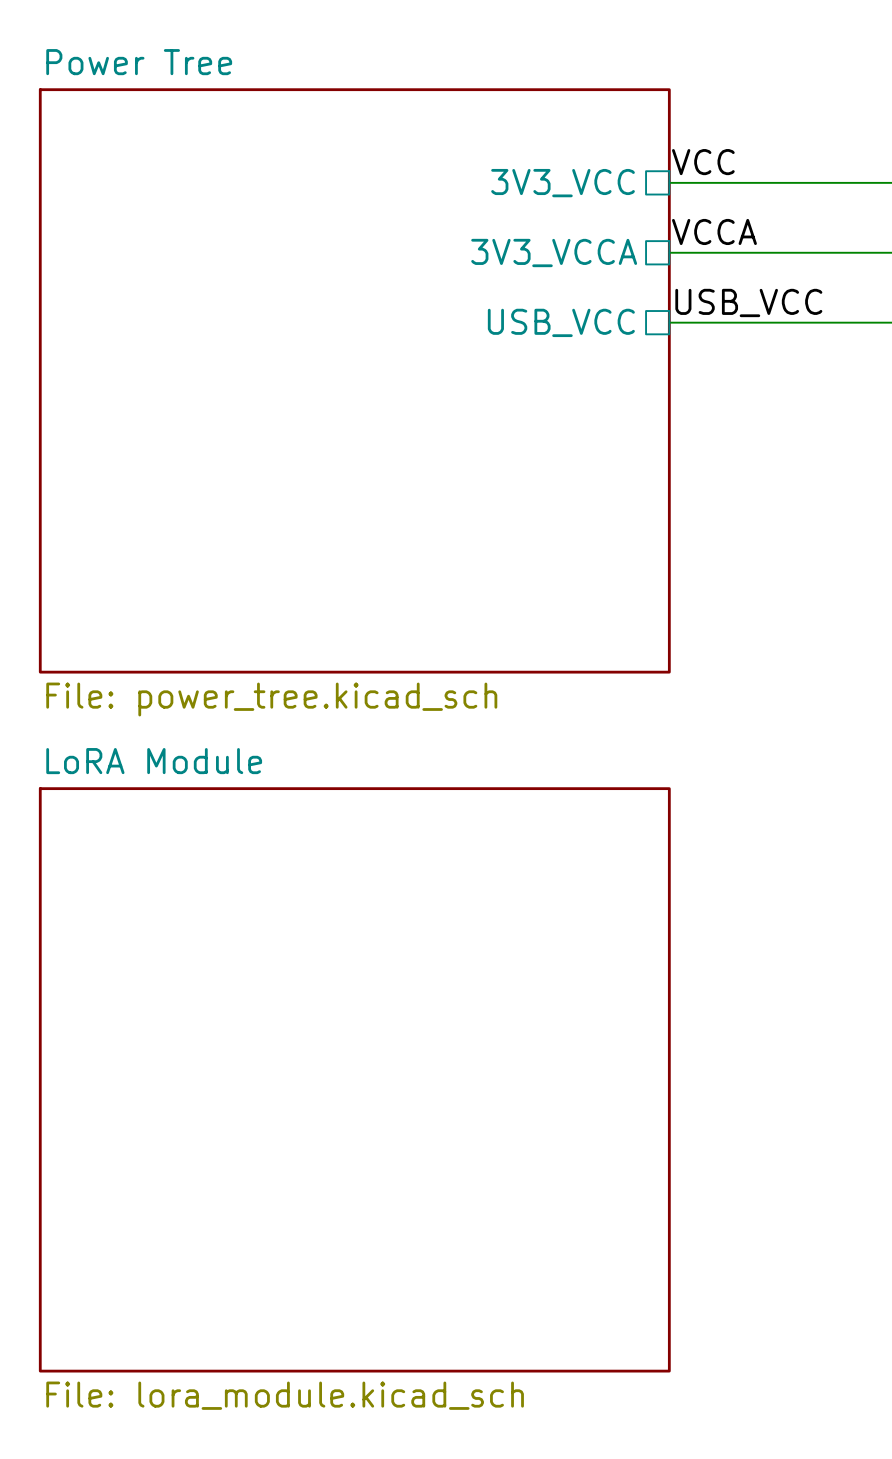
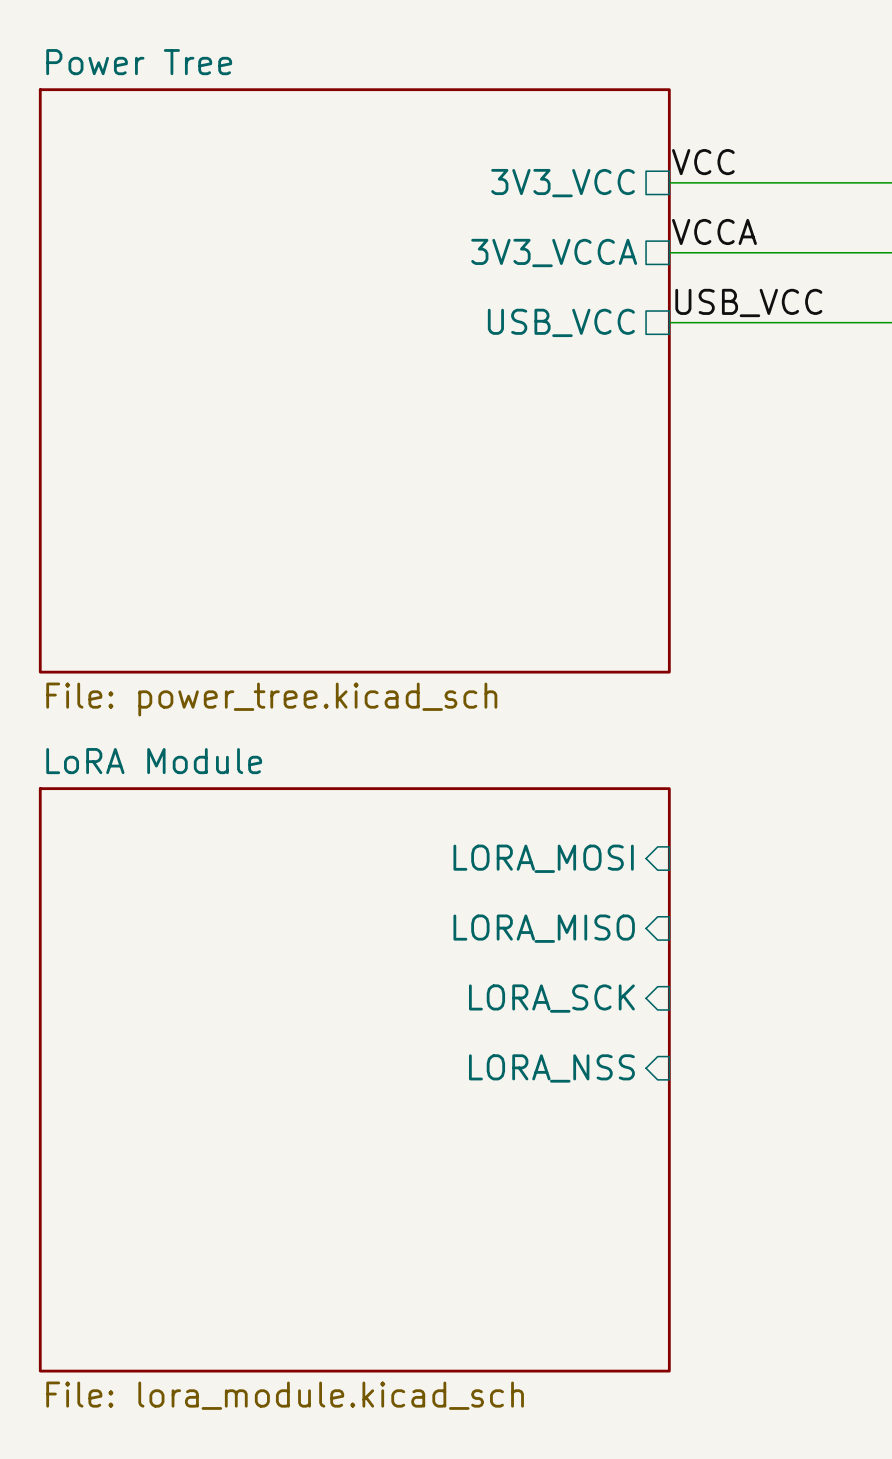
sheet pin: none -> LORA_MOSI (543, 858)
sheet pin: none -> LORA_MISO (544, 928)
sheet pin: none -> LORA_SCK (551, 998)
sheet pin: none -> LORA_NSS (551, 1068)

